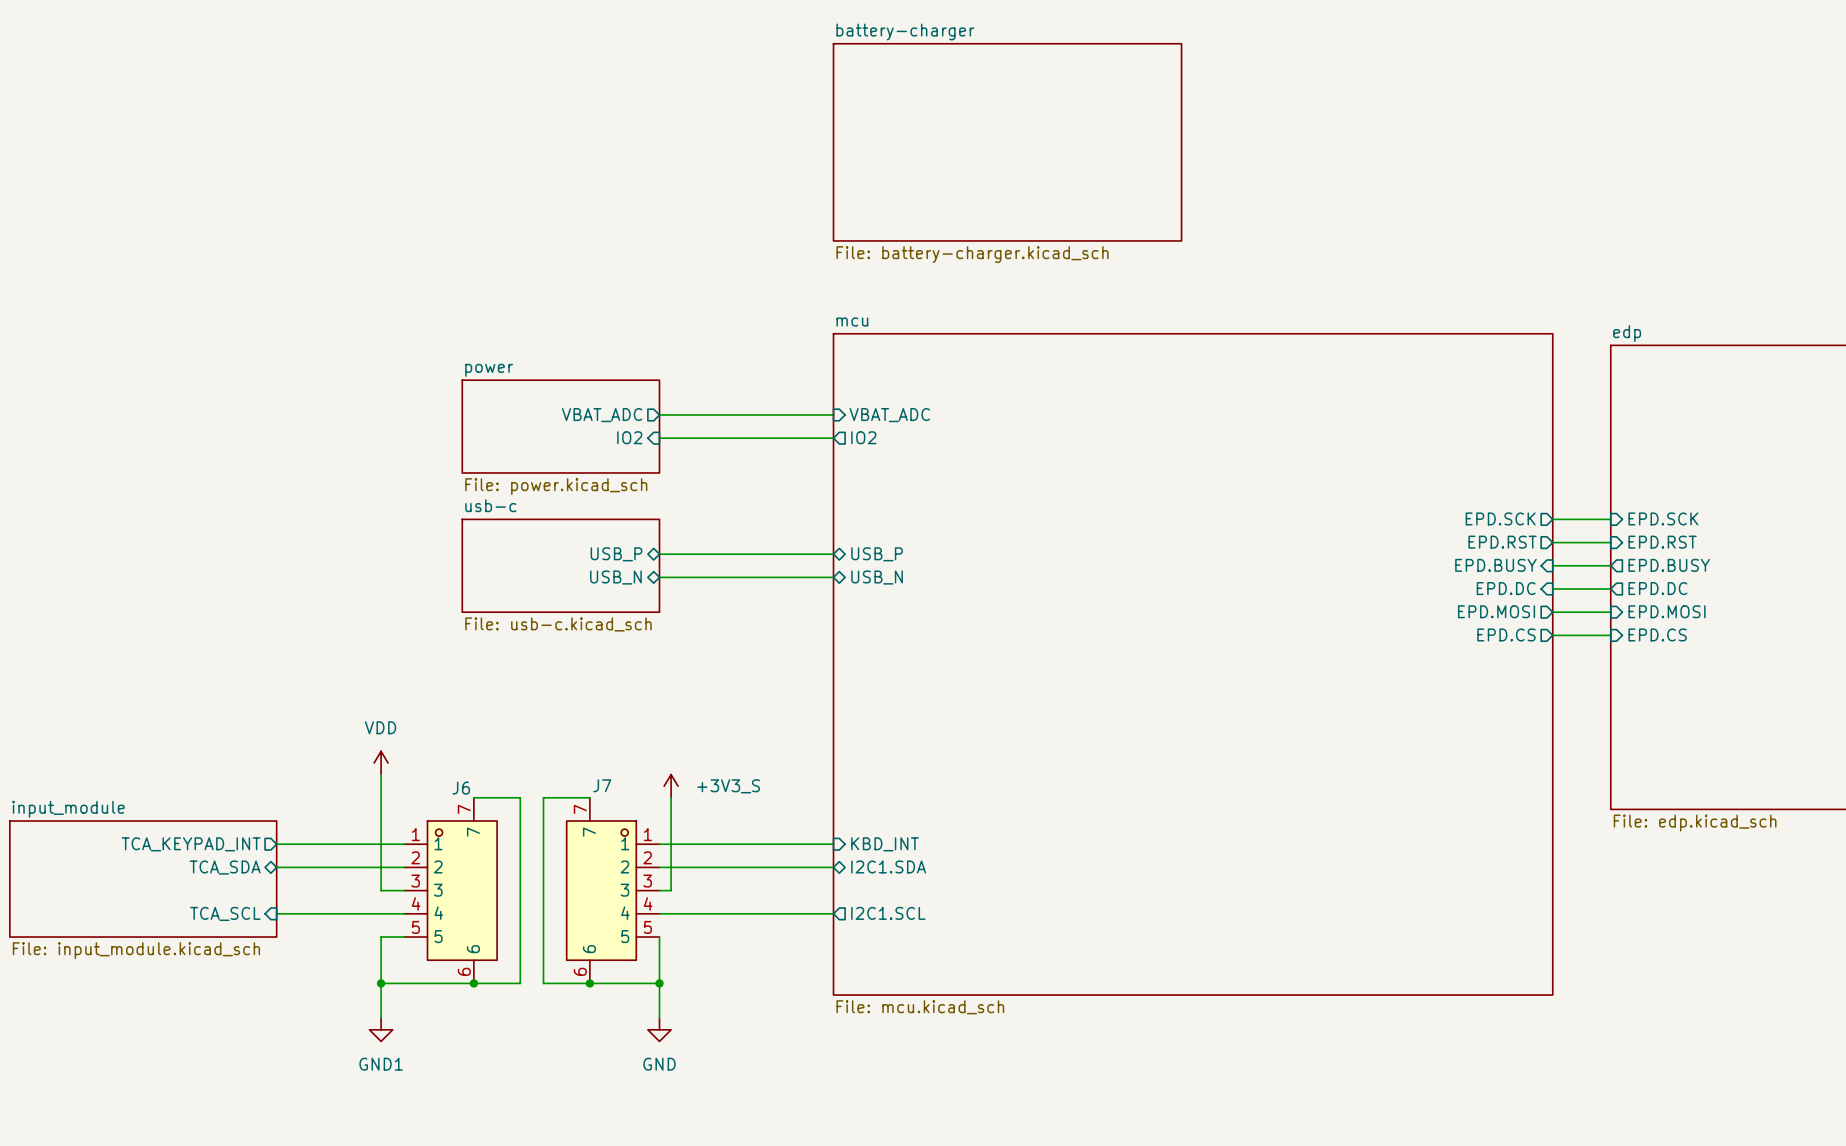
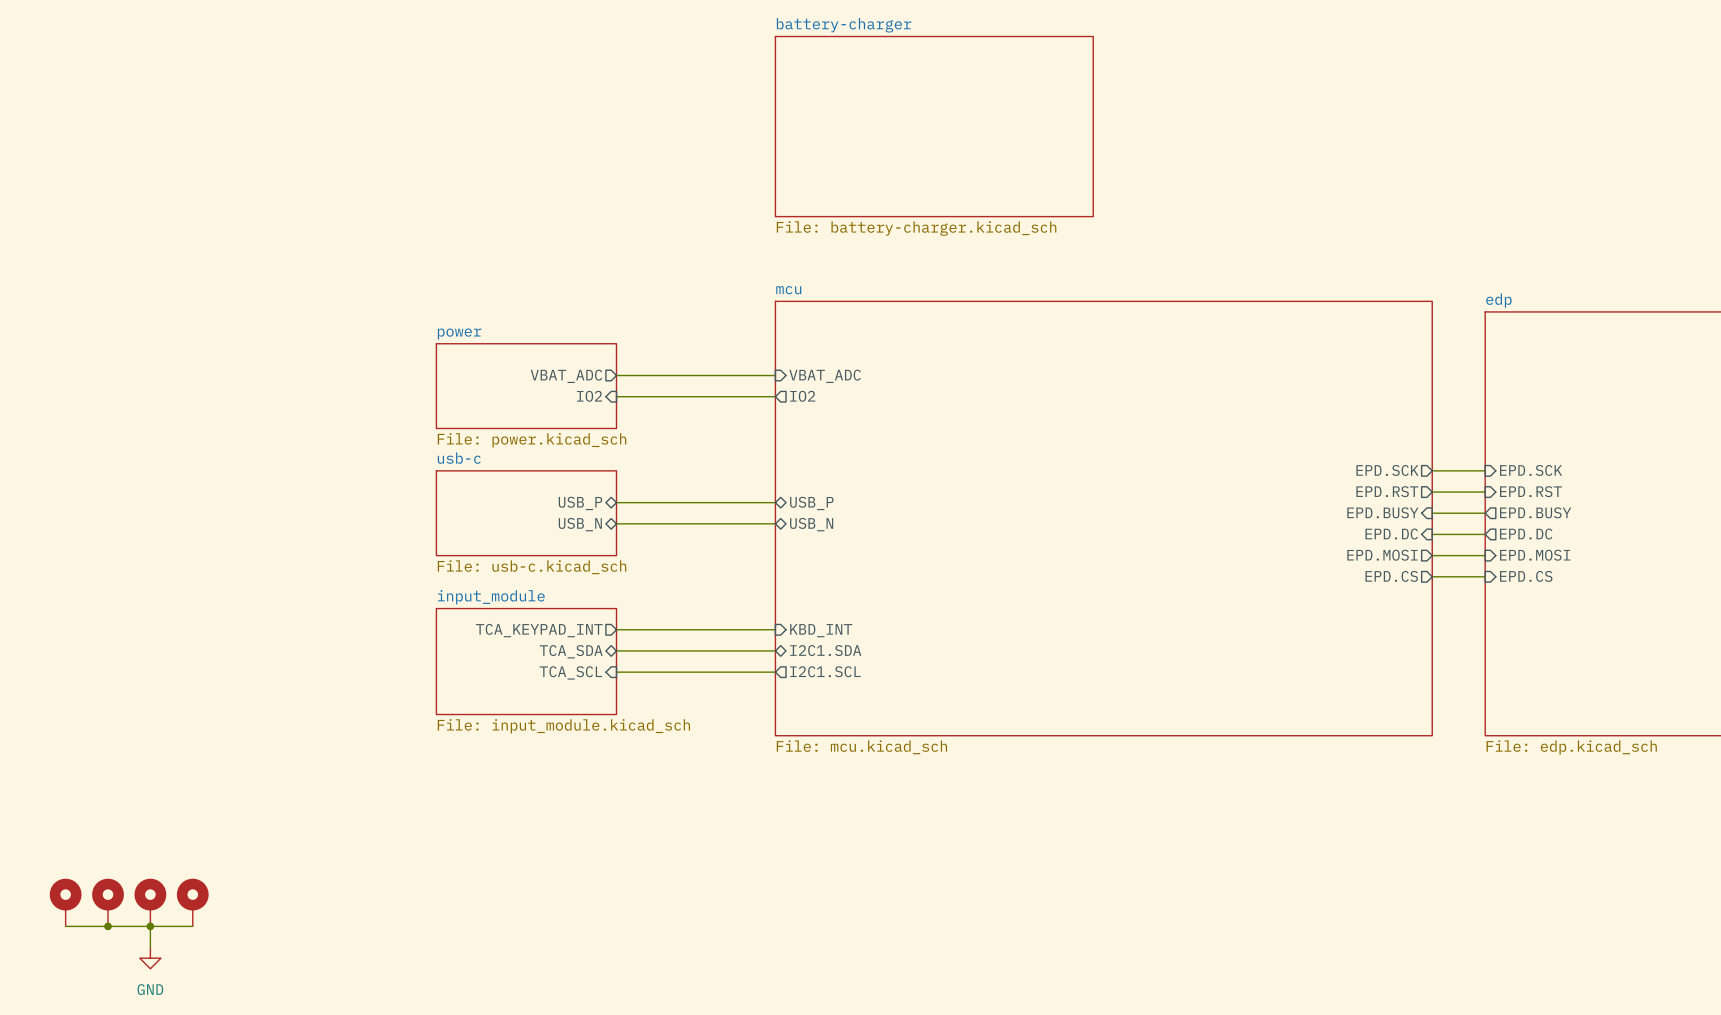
sheet mcu: none -> File: mcu.kicad_sch (1103, 518)
sheet mcu: File: mcu.kicad_sch (1193, 664) -> none
sheet pin: none -> TCA_KEYPAD_INT (539, 630)
sheet pin: none -> TCA_SDA (571, 651)
sheet input_module: none -> File: input_module.kicad_sch (526, 661)
sheet pin: none -> TCA_SCL (570, 672)
power symbol: VDD (381, 763) -> none
wire: (381, 774) (381, 890) (404, 890) -> none
power symbol: +3V3_S (671, 786) -> none
wire: (473, 797) (520, 797) (520, 983) (381, 983) -> none
wire: (589, 797) (543, 797) (543, 983) (659, 983) -> none
wire: (671, 797) (671, 890) (659, 890) -> none
sheet pin: TCA_KEYPAD_INT (191, 844) -> none
wire: (276, 844) (404, 844) -> none
wire: (659, 844) (833, 844) -> (616, 650) (775, 650)
sheet pin position: KBD_INT (885, 844) -> KBD_INT (821, 630)
sheet pin position: I2C1.SDA (888, 866) -> I2C1.SDA (825, 650)
sheet pin: TCA_SDA (225, 867) -> none
wire: (276, 867) (404, 867) -> none
wire: (659, 867) (833, 867) -> (616, 672) (775, 672)
sheet input_module: File: input_module.kicad_sch (143, 879) -> none
J6: (450, 890) -> none
J7: (613, 890) -> none
sheet pin: TCA_SCL (225, 913) -> none
wire: (276, 913) (404, 913) -> none
wire: (659, 913) (833, 913) -> (616, 629) (775, 629)
sheet pin position: I2C1.SCL (888, 913) -> I2C1.SCL (825, 671)
wire: (404, 937) (381, 937) (381, 1018) -> none
wire: (659, 937) (659, 1018) -> none
junction: (381, 983) -> none
junction: (473, 983) -> none
junction: (589, 983) -> none
junction: (659, 983) -> none
part: none -> (65, 902)
part: none -> (108, 902)
part: none -> (150, 902)
part: none -> (192, 902)
wire: none -> (65, 926) (192, 926)
junction: none -> (108, 926)
wire: none -> (150, 926) (150, 947)
junction: none -> (150, 926)
power symbol: GND1 (381, 1029) -> none
power symbol: GND (659, 1029) -> none
power symbol: none -> GND (150, 958)

